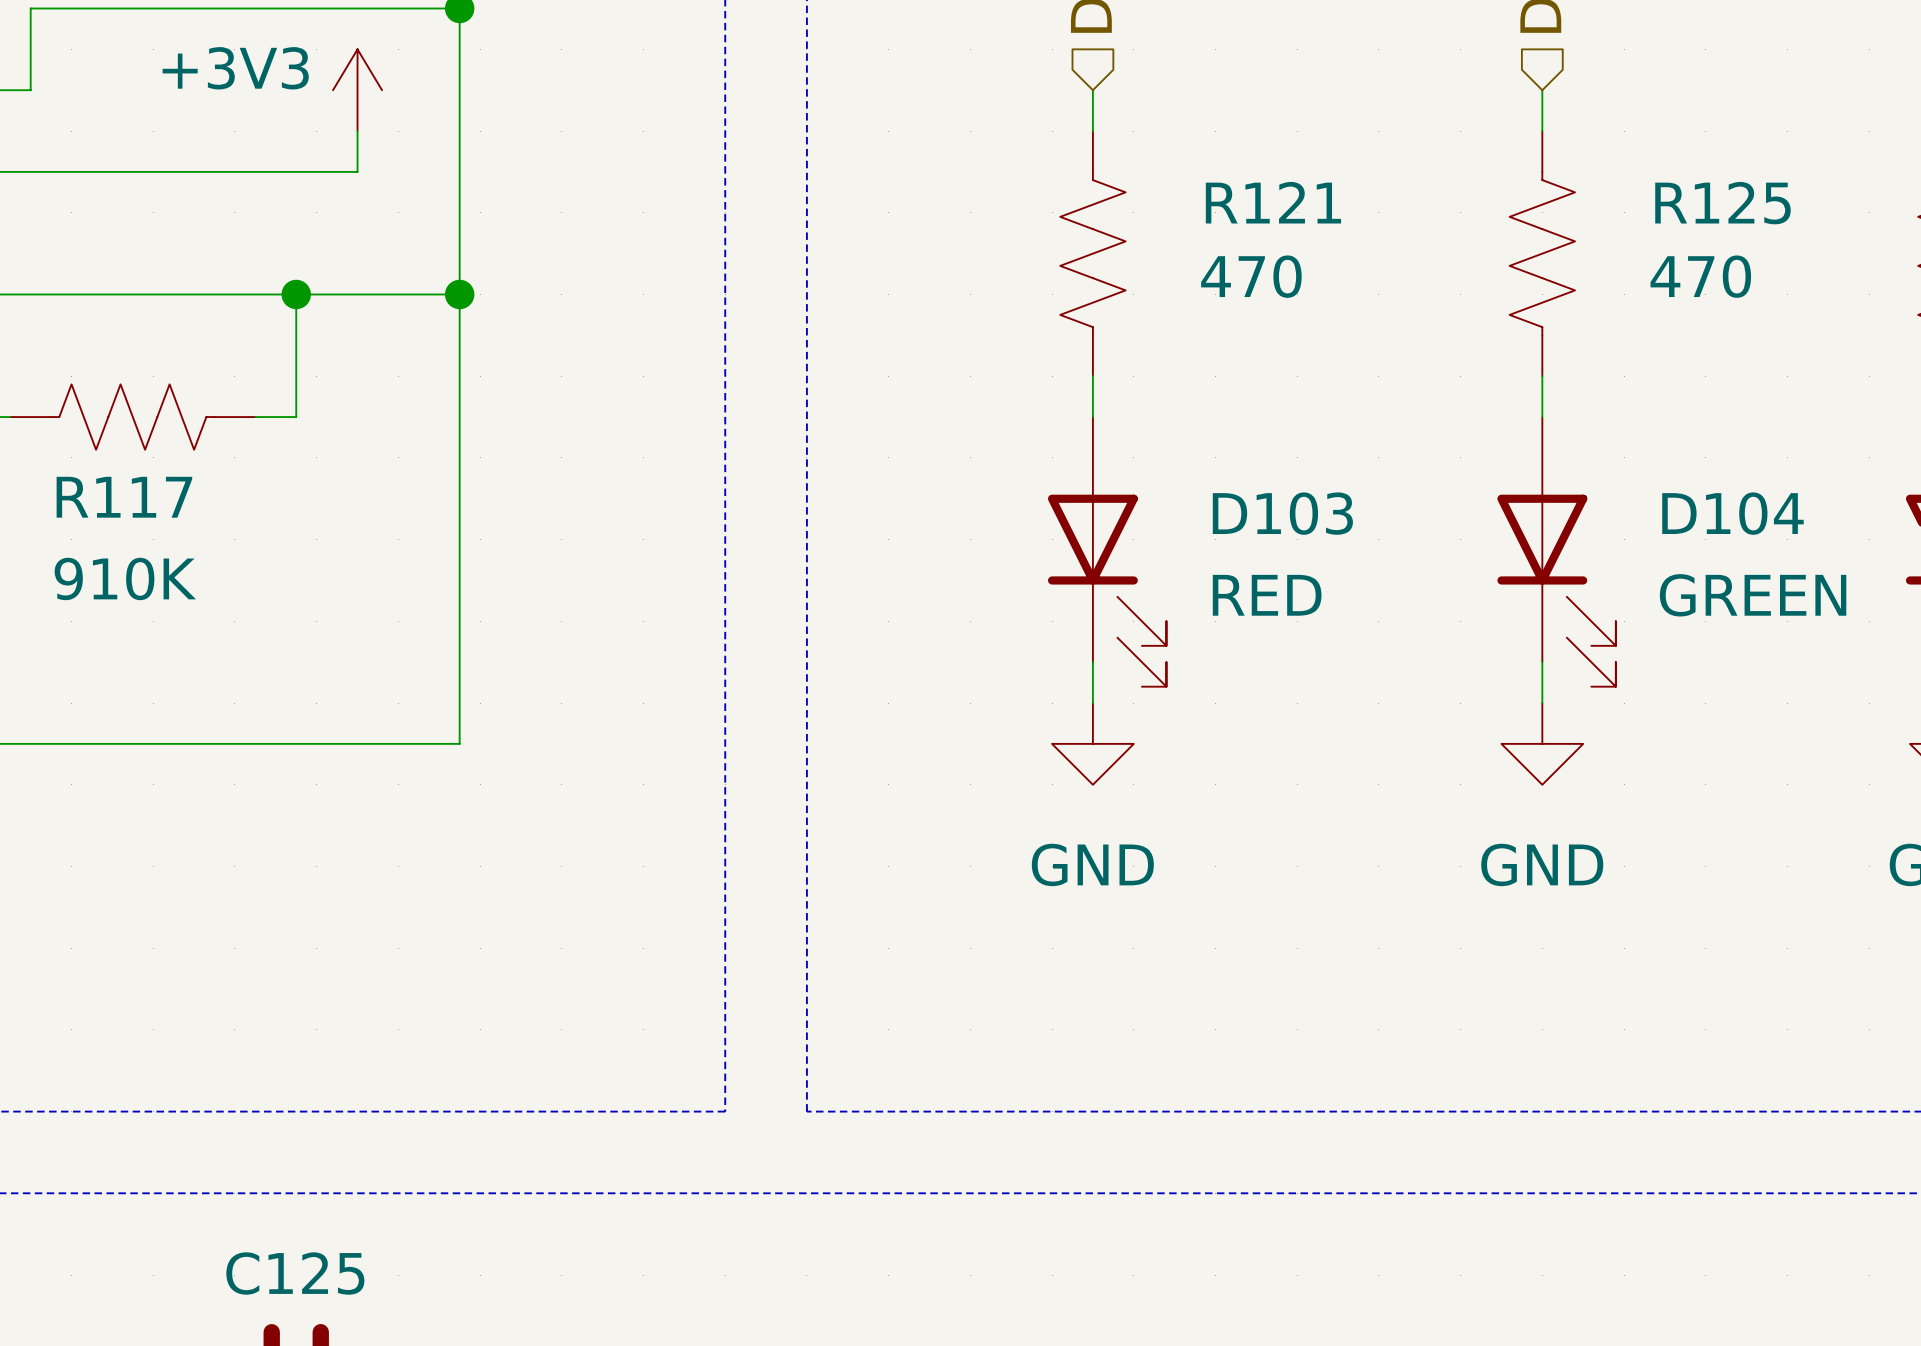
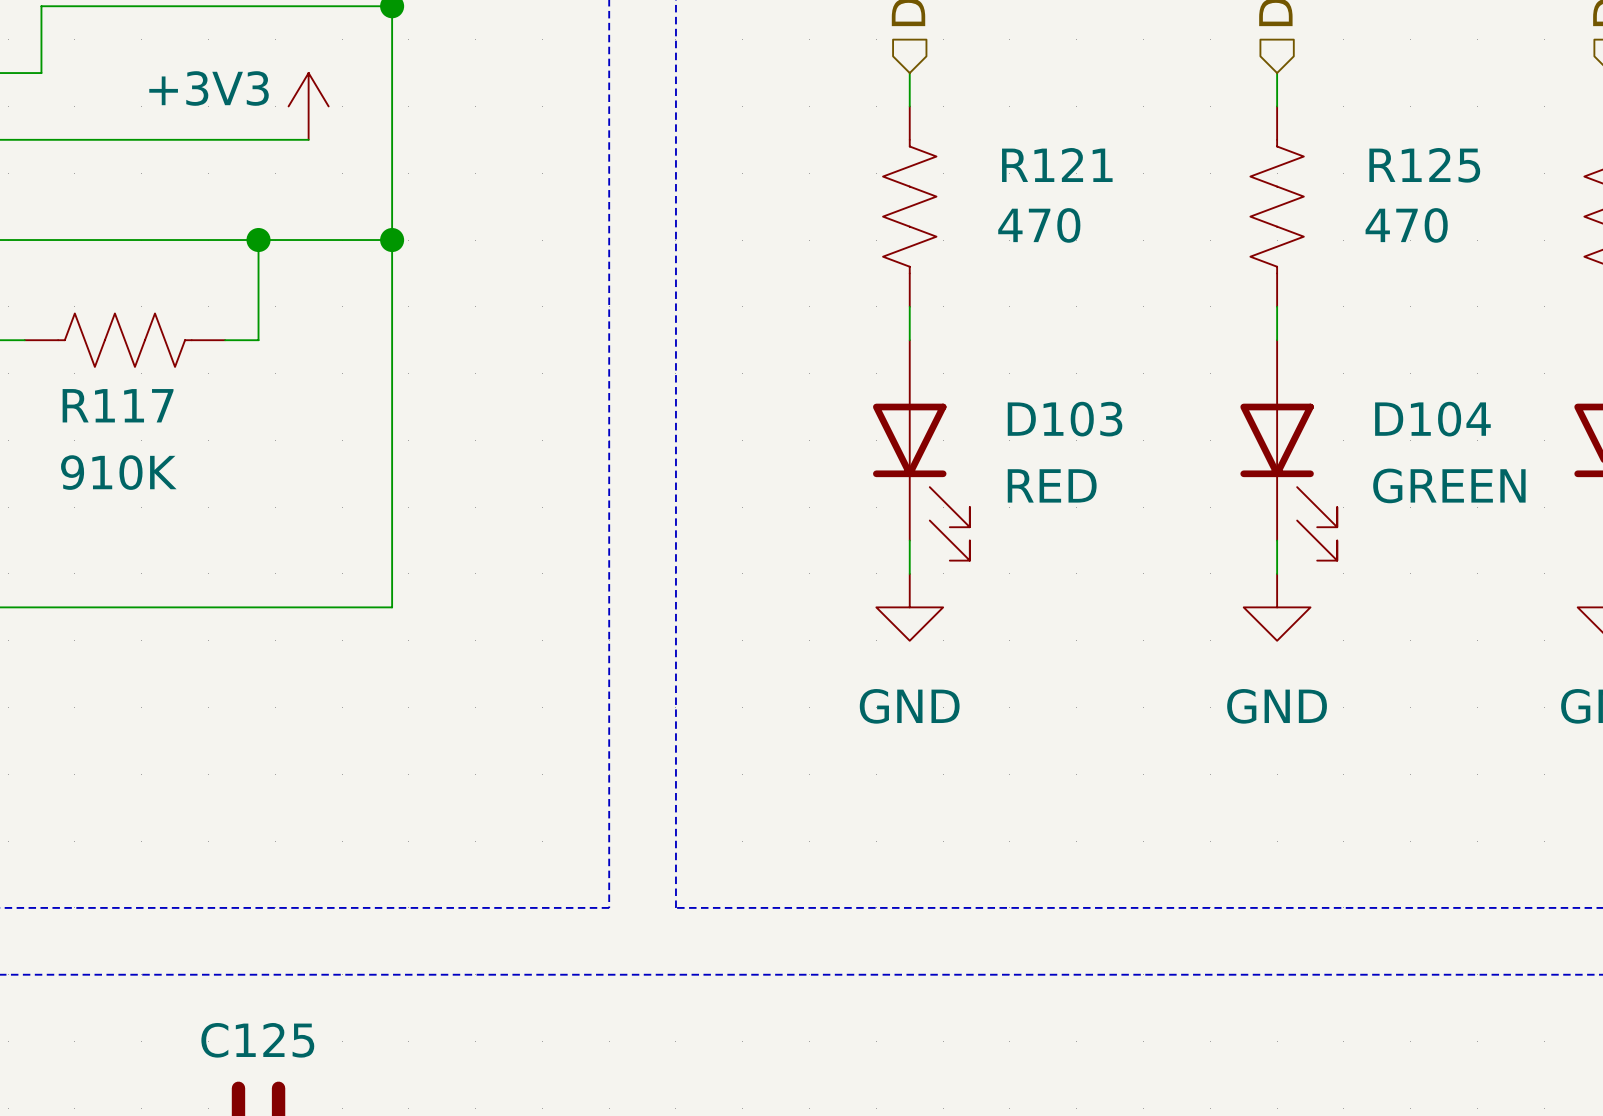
power symbol position: +3V3 (357, 90) -> +3V3 (308, 106)

